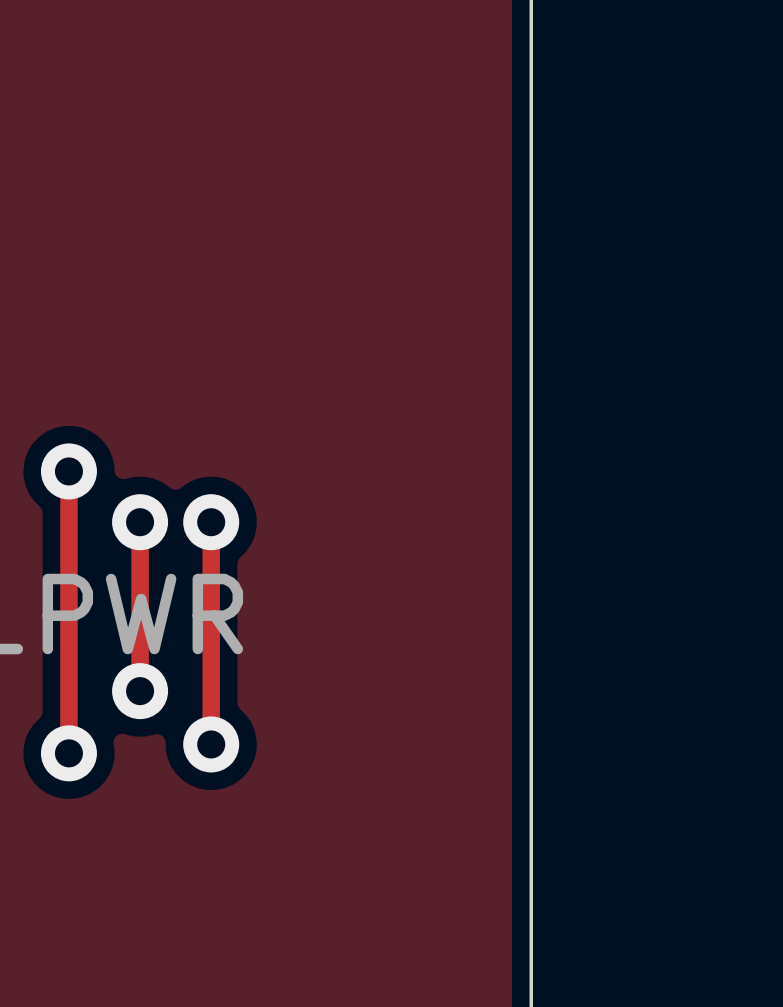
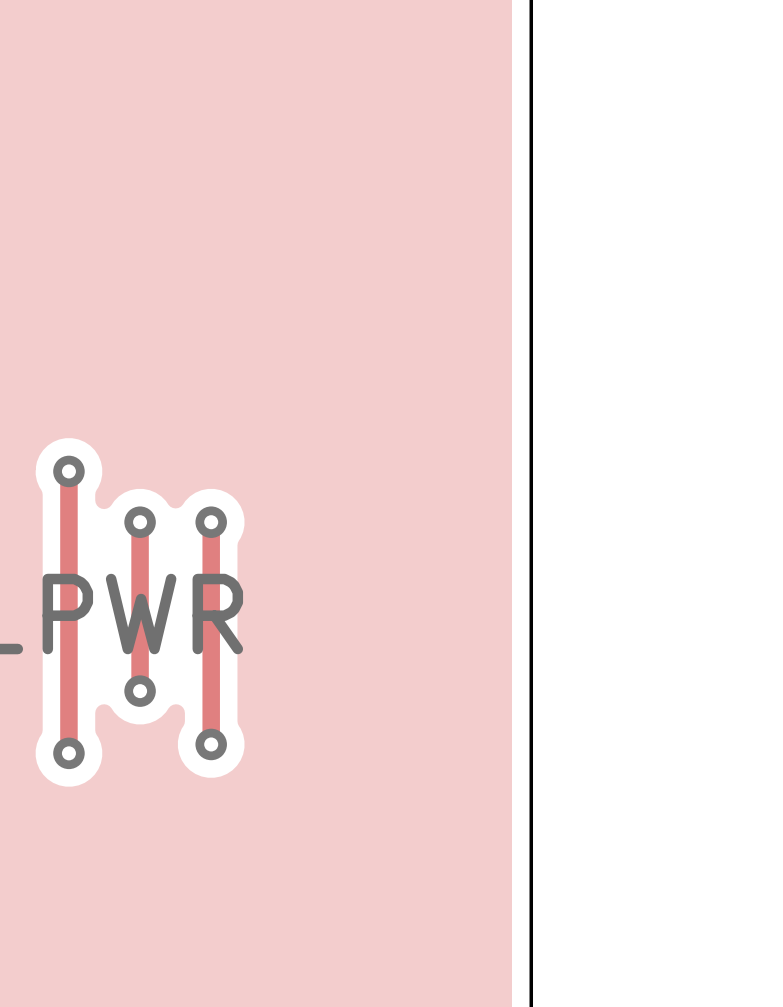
via size: [40, 443, 97, 500] -> [53, 455, 85, 488]
via size: [112, 494, 169, 551] -> [124, 506, 156, 538]
via size: [183, 494, 240, 551] -> [195, 506, 227, 538]
via size: [112, 663, 169, 720] -> [124, 675, 156, 707]
via size: [183, 716, 240, 773] -> [195, 728, 227, 761]
via size: [40, 725, 97, 782] -> [53, 737, 85, 770]

